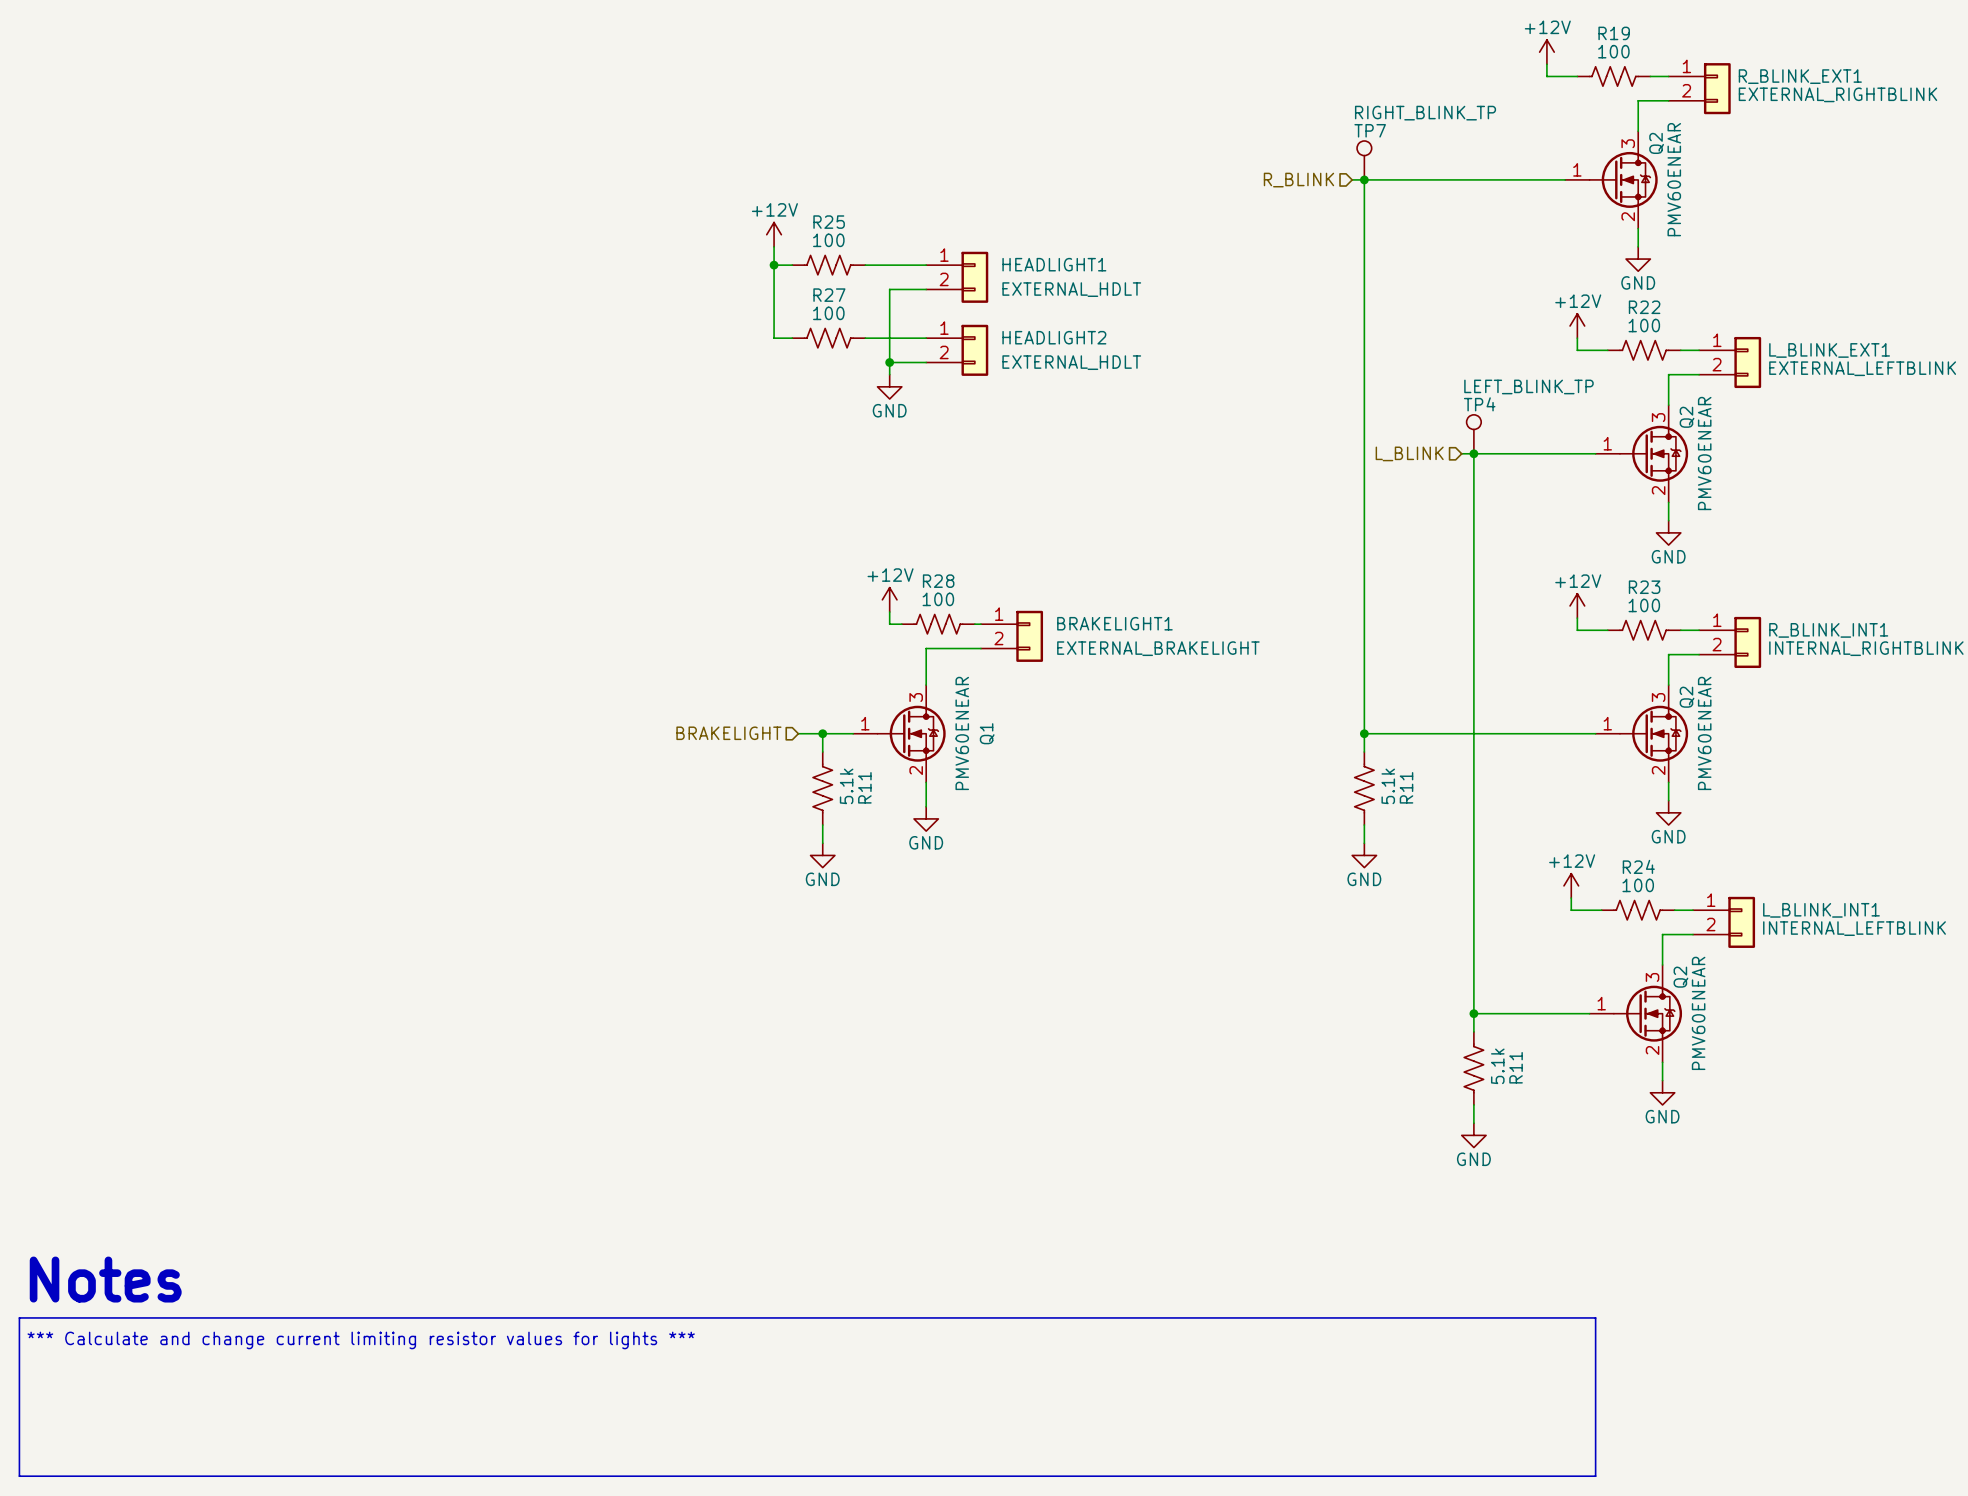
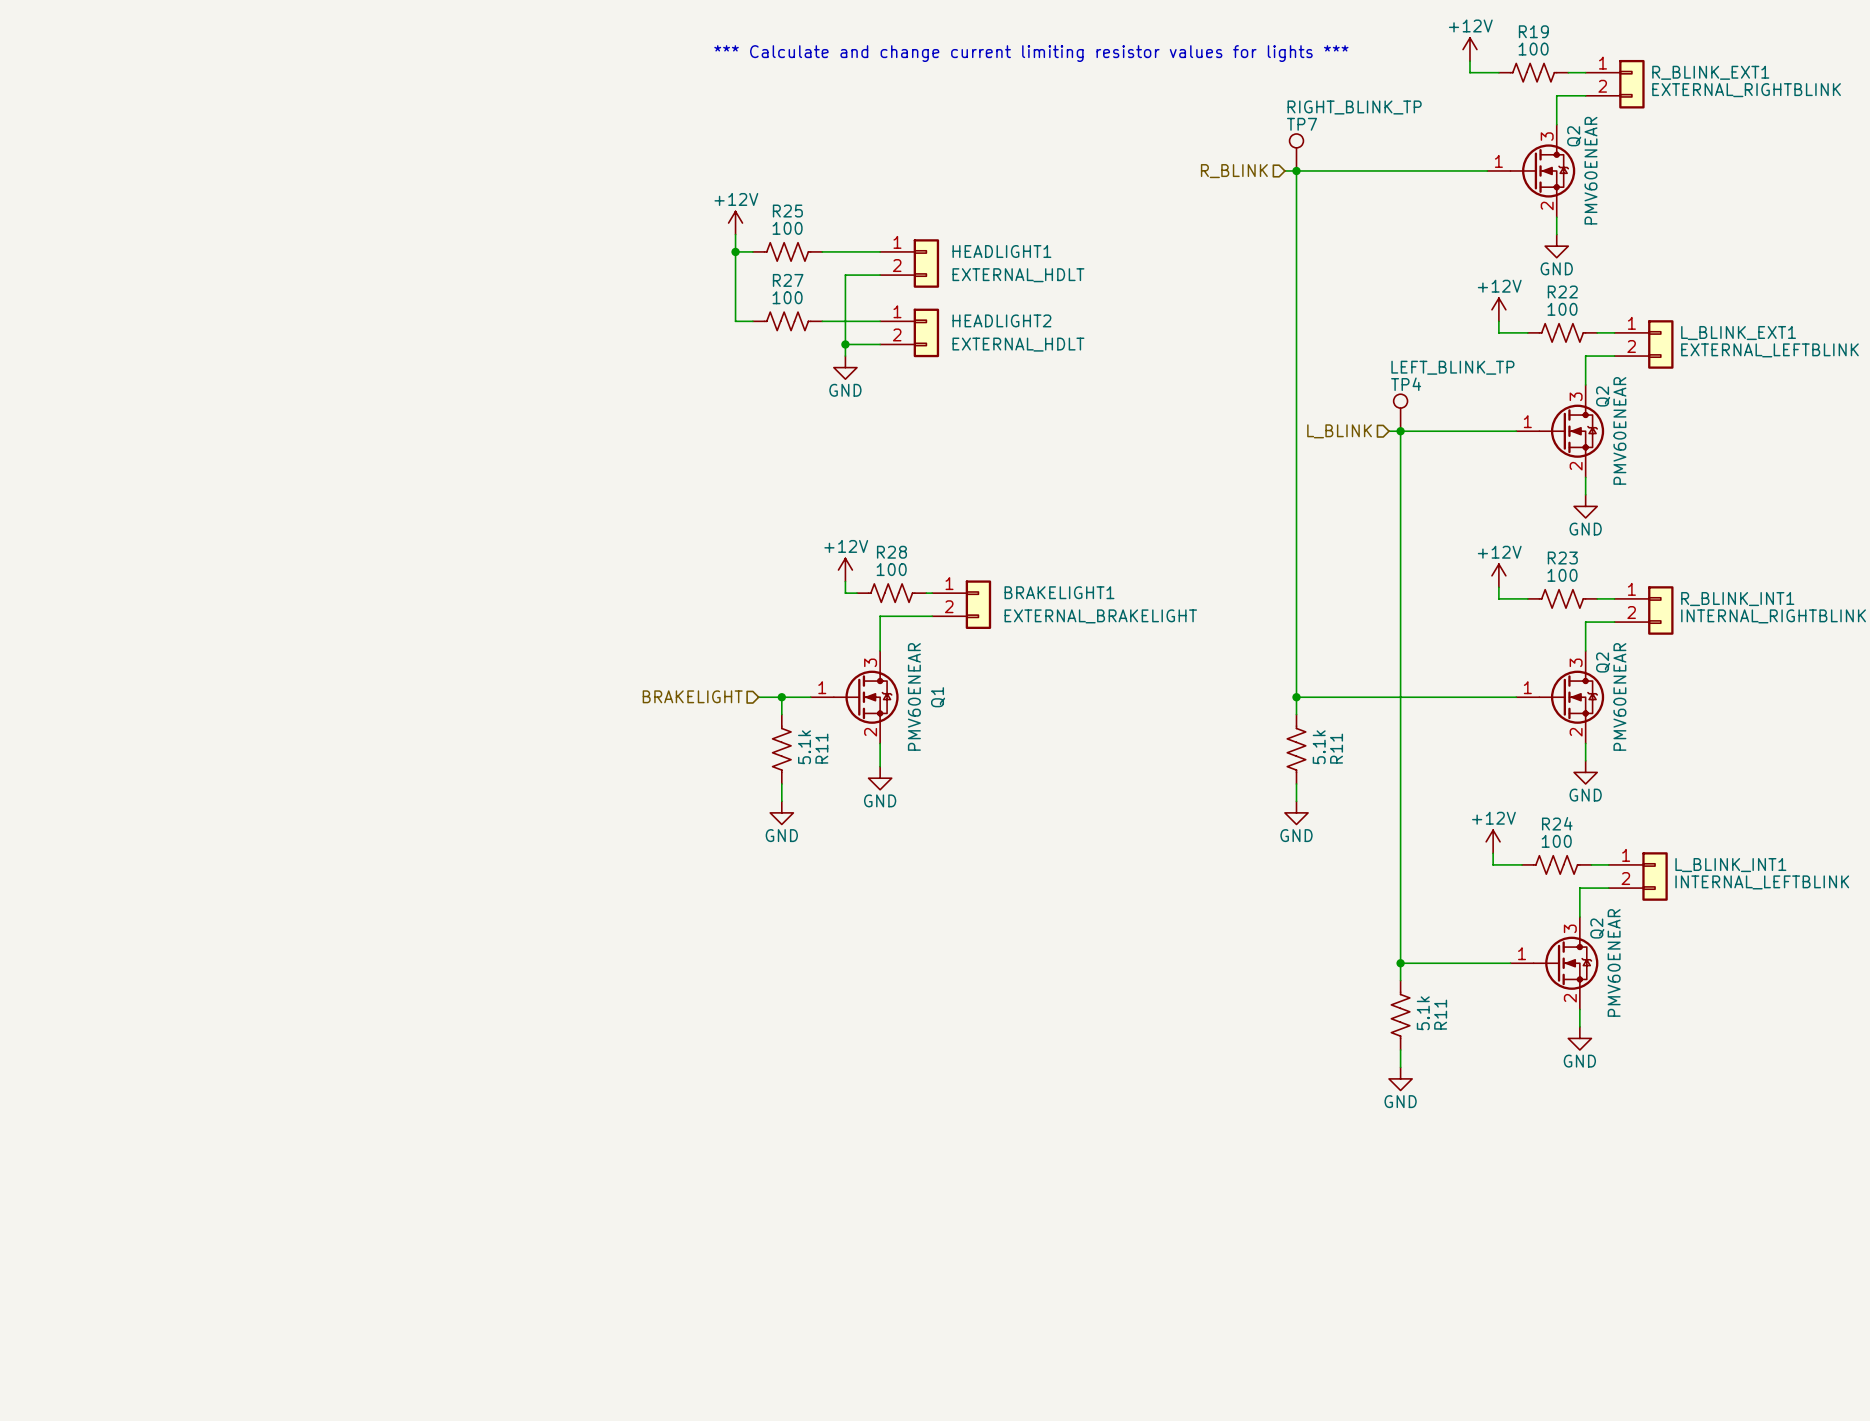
text: none -> *** Calculate and change current limiting resistor values for lights *** (1031, 53)
text: Notes (105, 1279) -> none
line: (19, 1317) (1595, 1317) (1595, 1476) (19, 1476) (19, 1317) -> none
text: *** Calculate and change current limiting resistor values for lights *** (361, 1340) -> none

